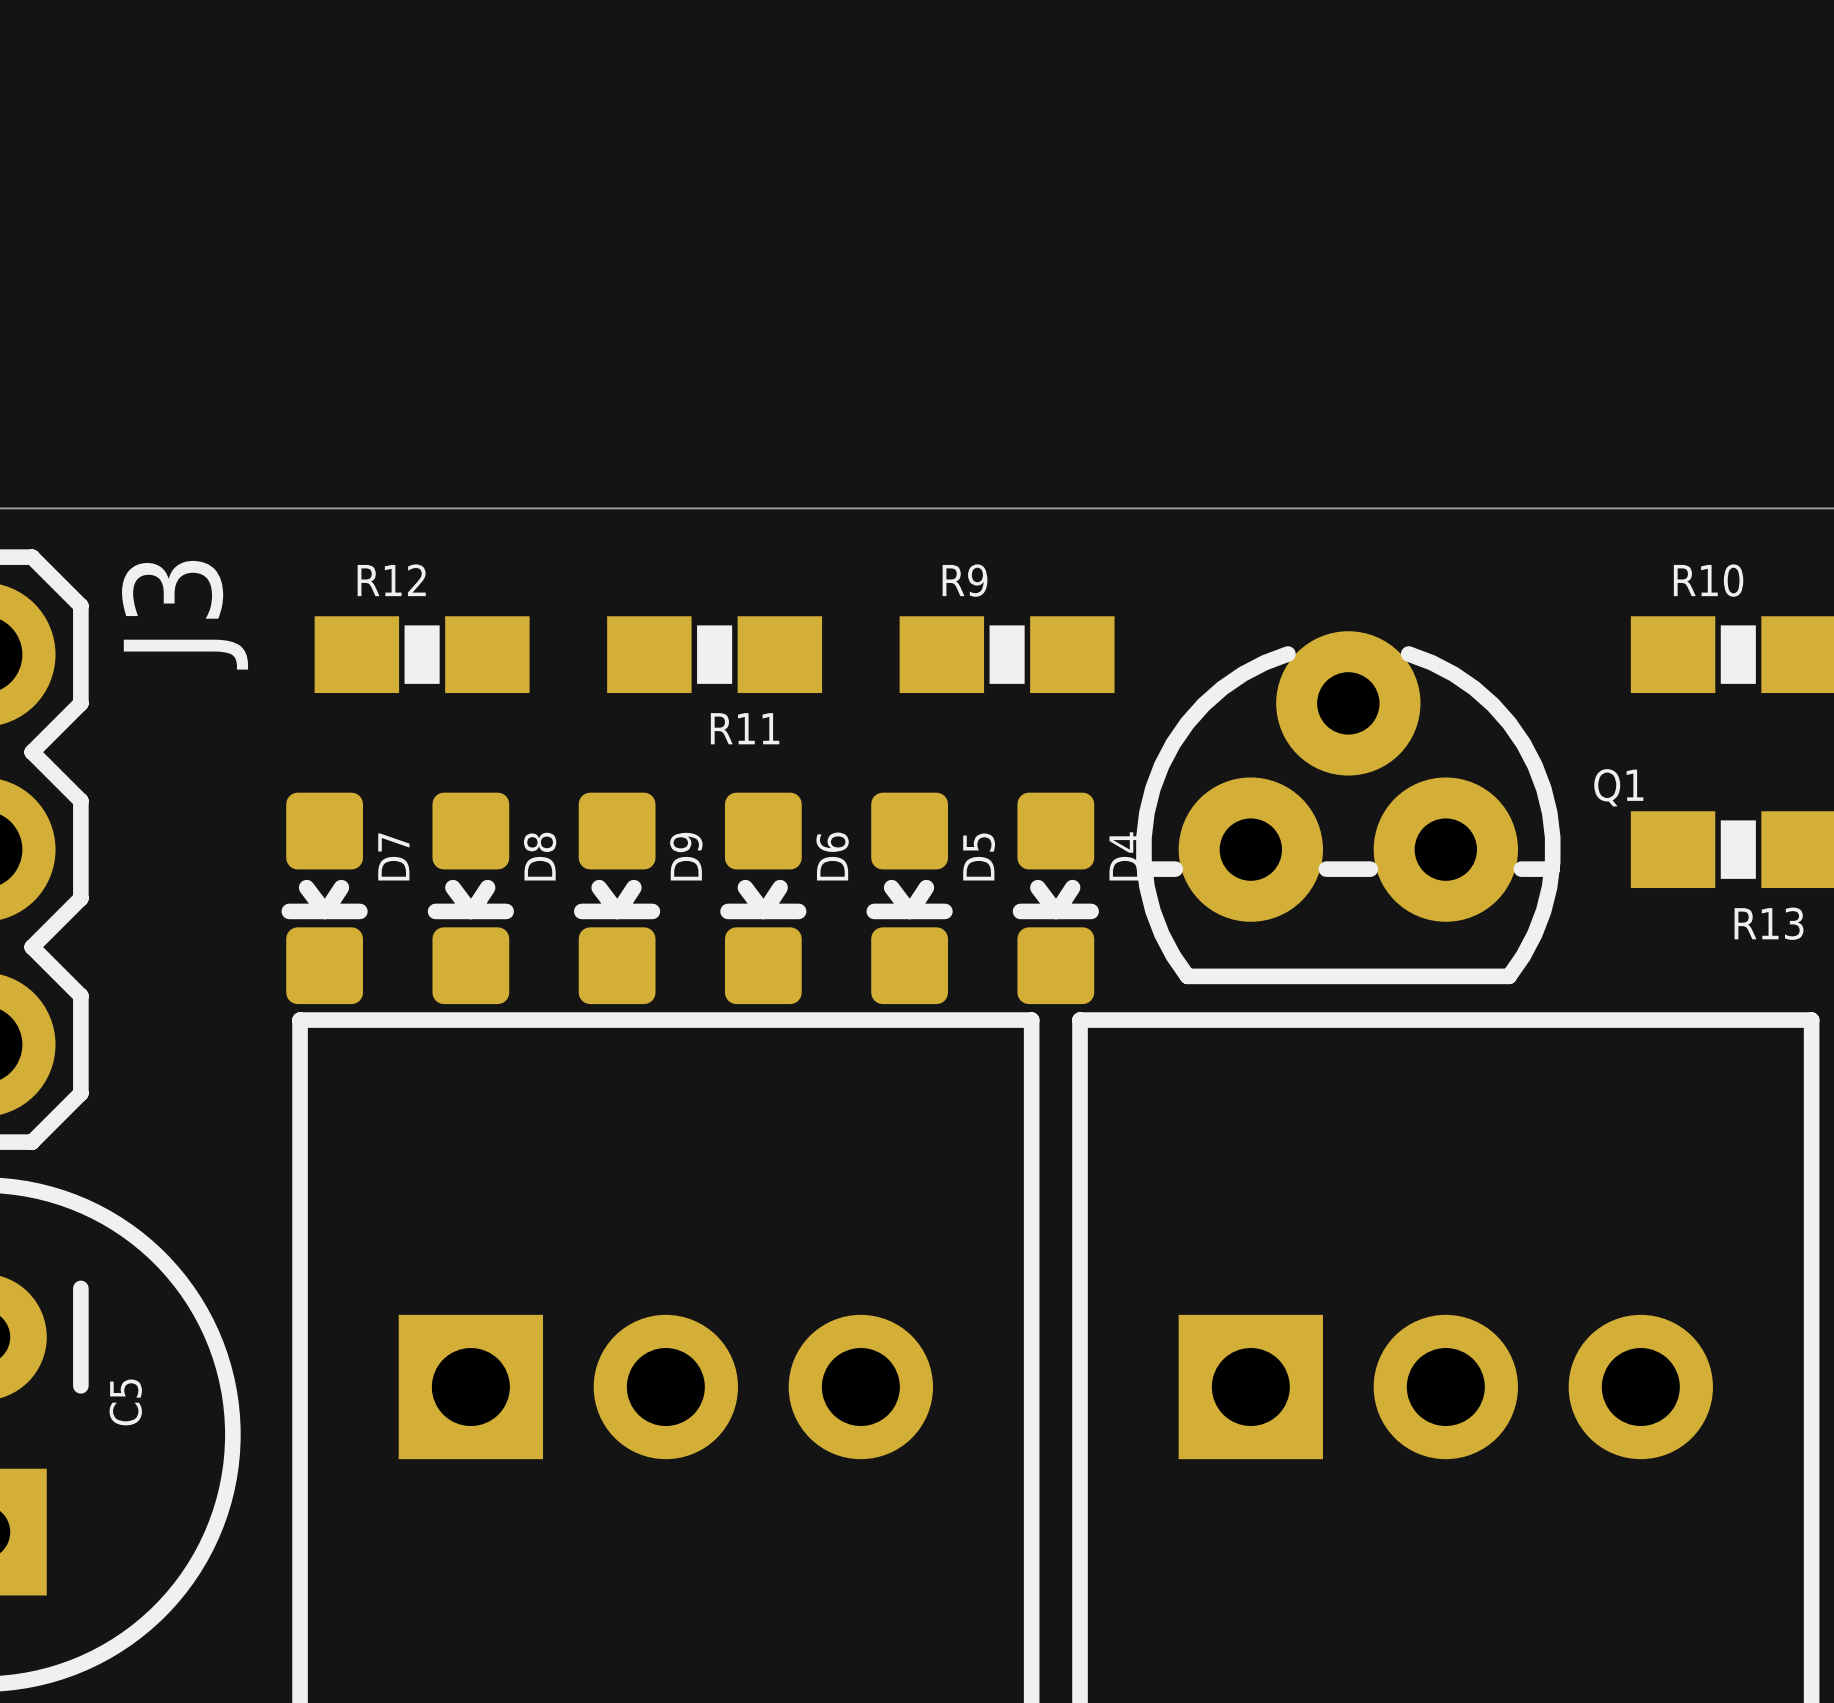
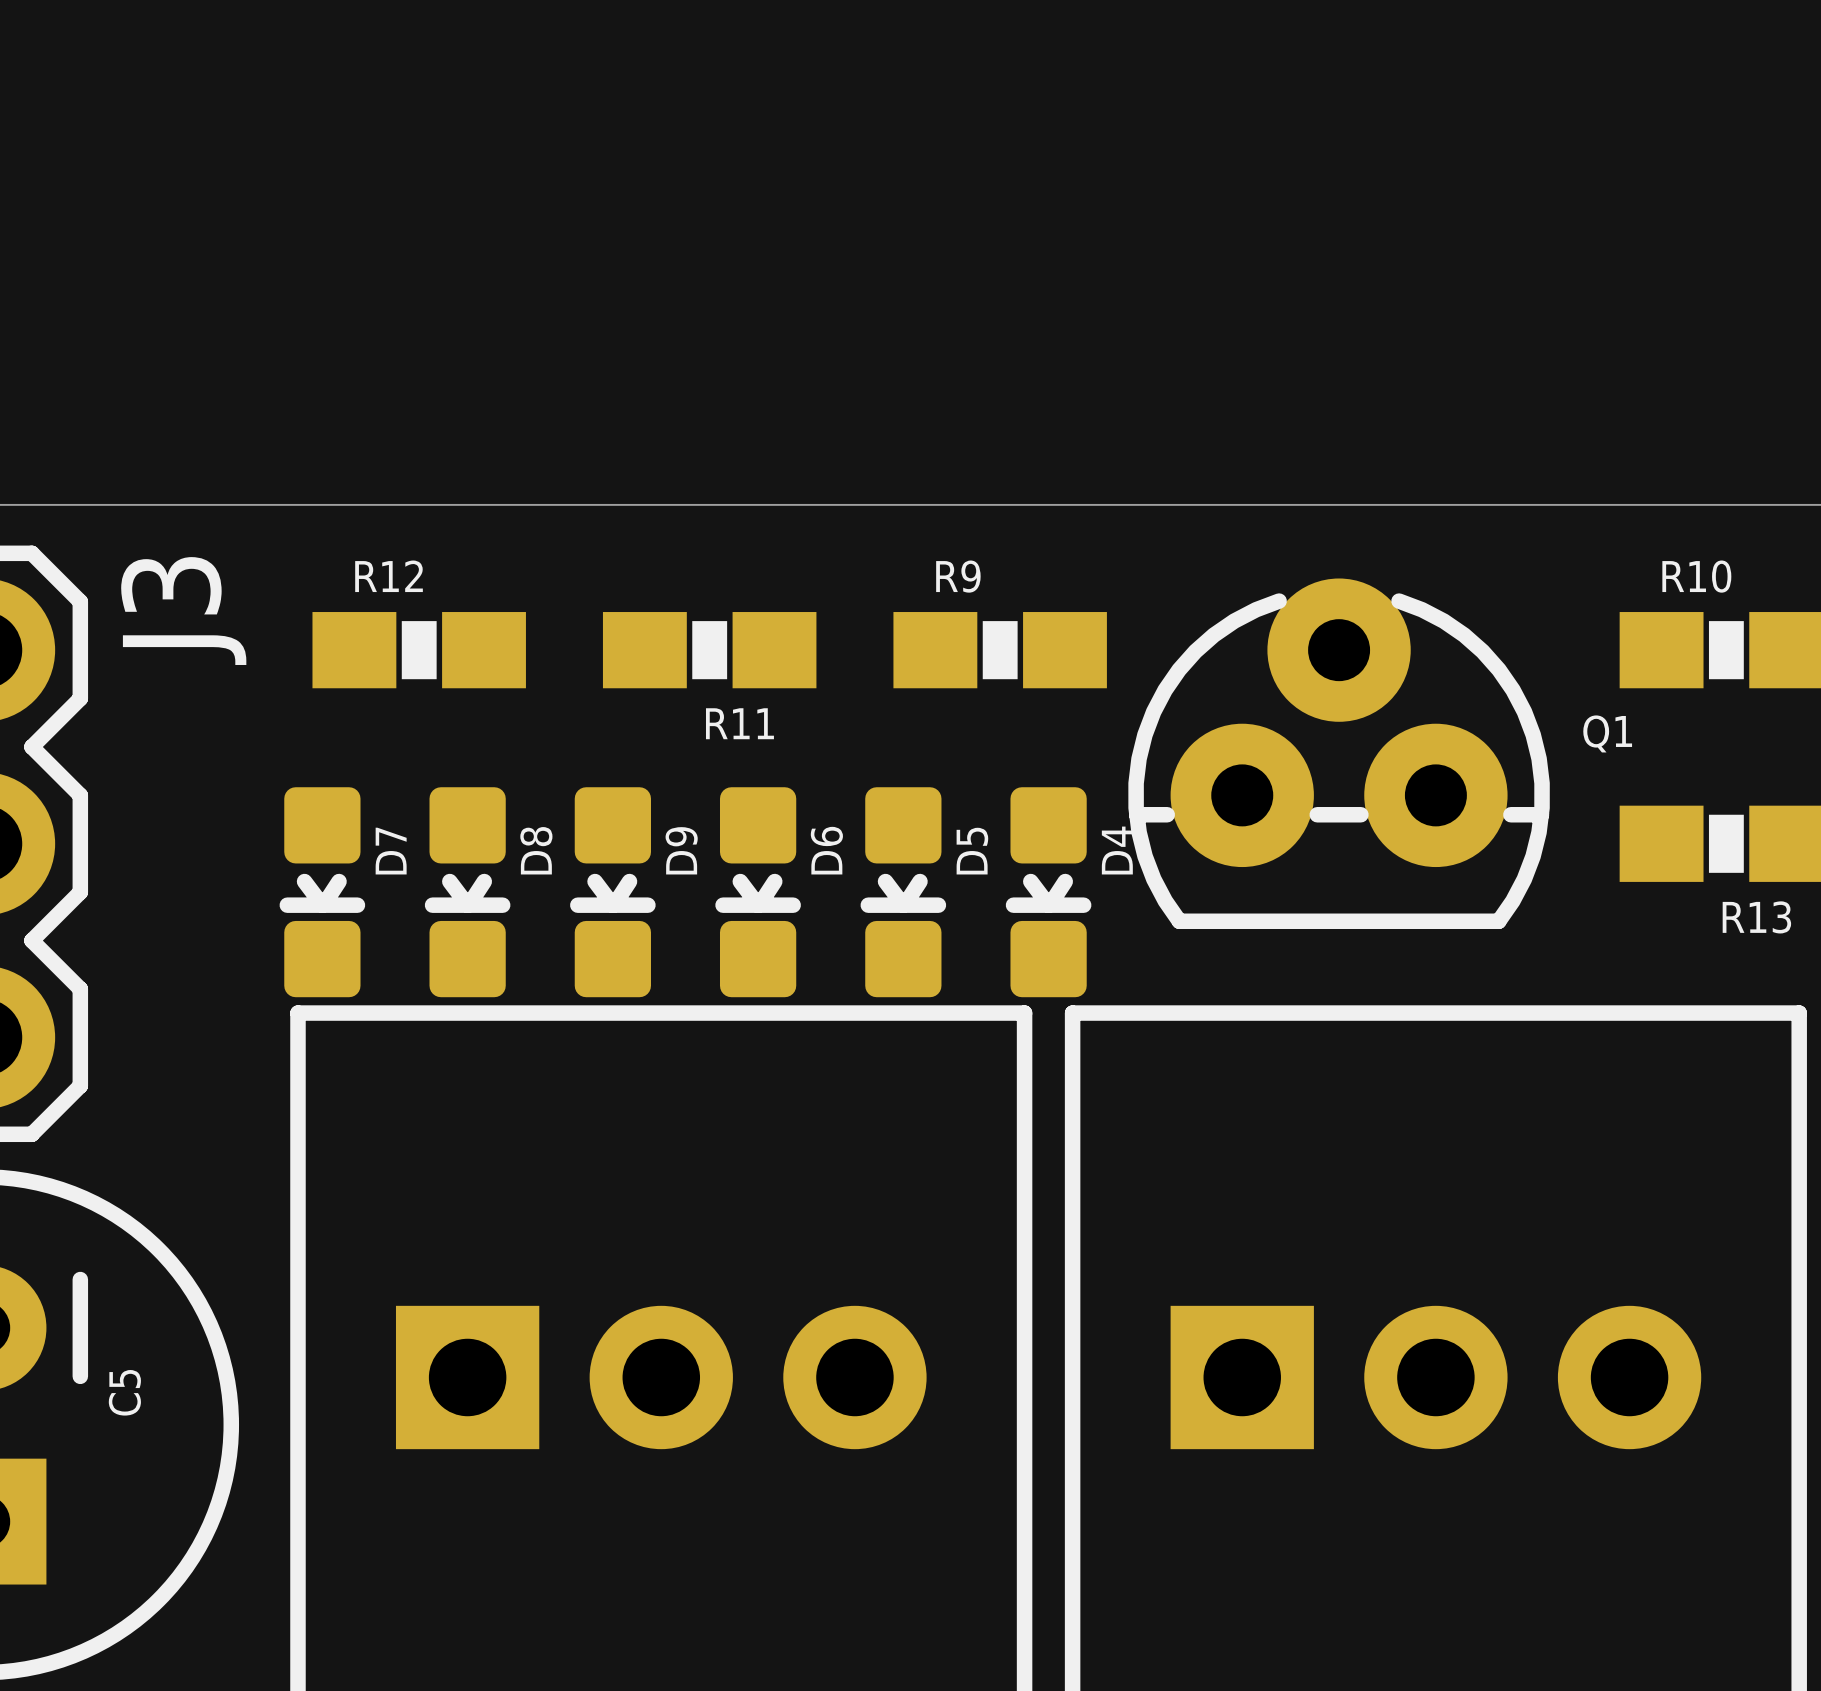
Q1 position: (1348, 807) -> (1339, 753)

